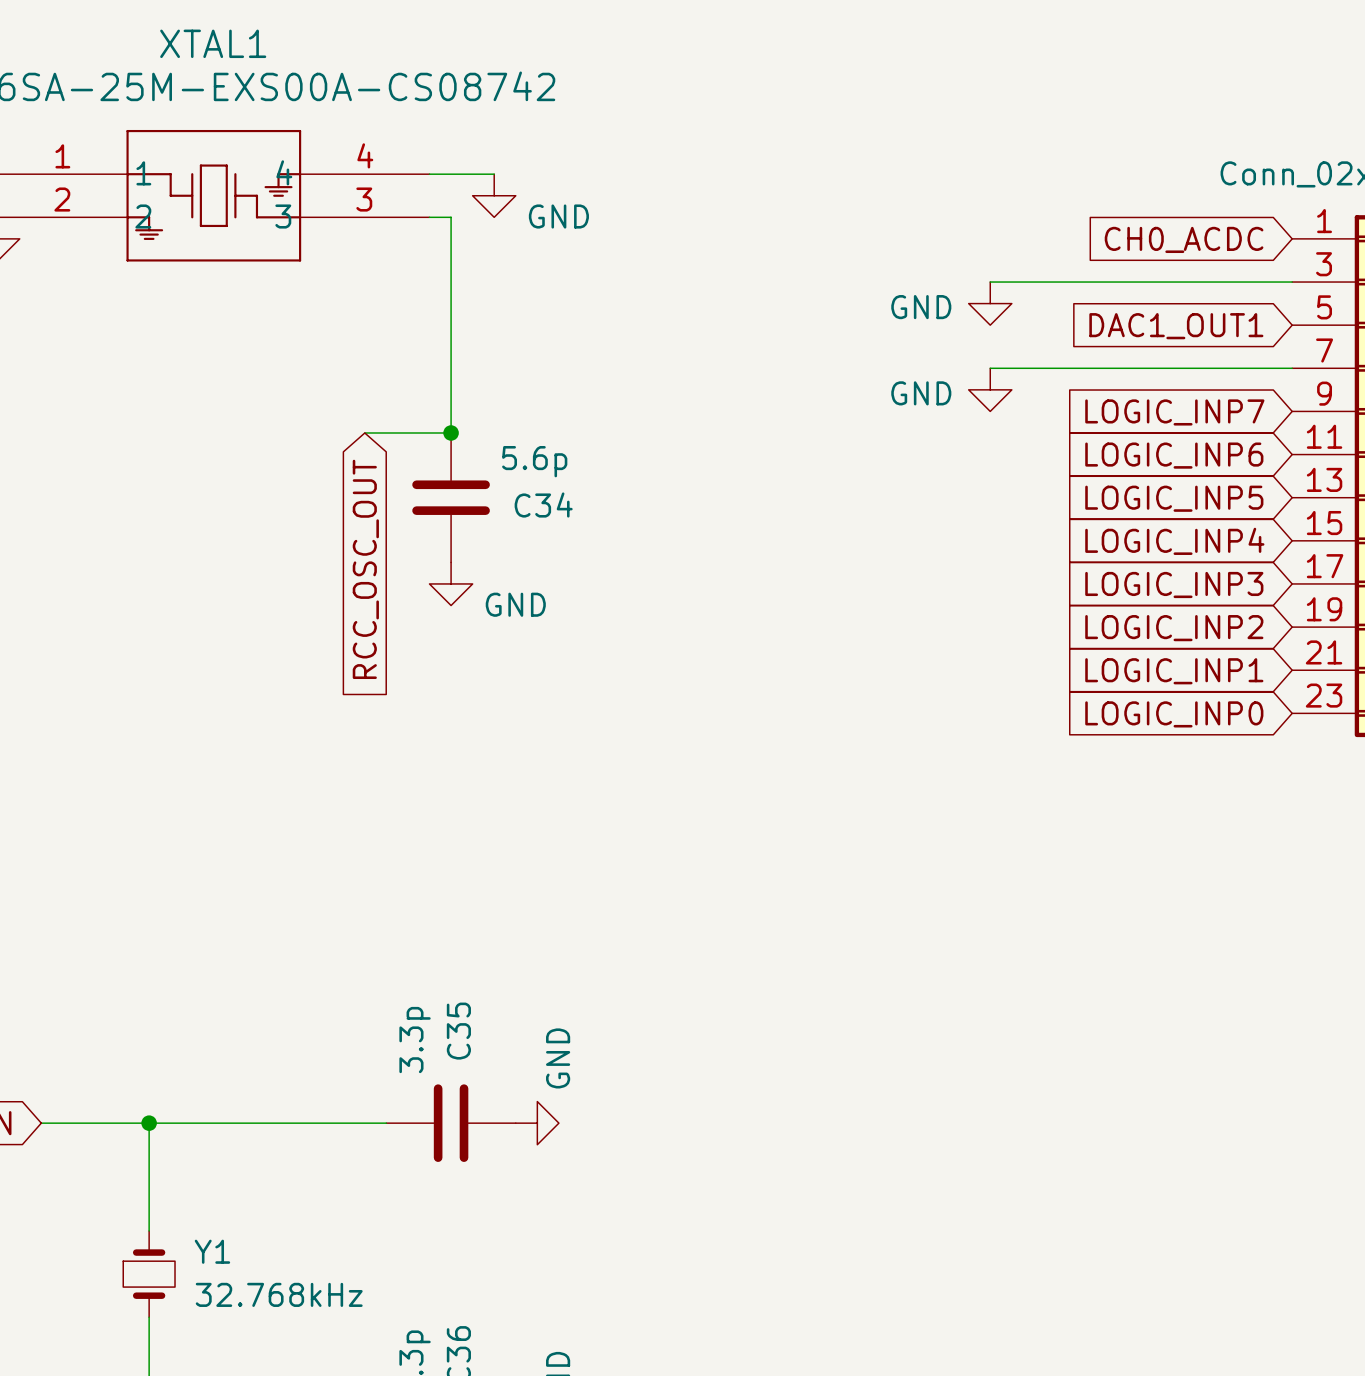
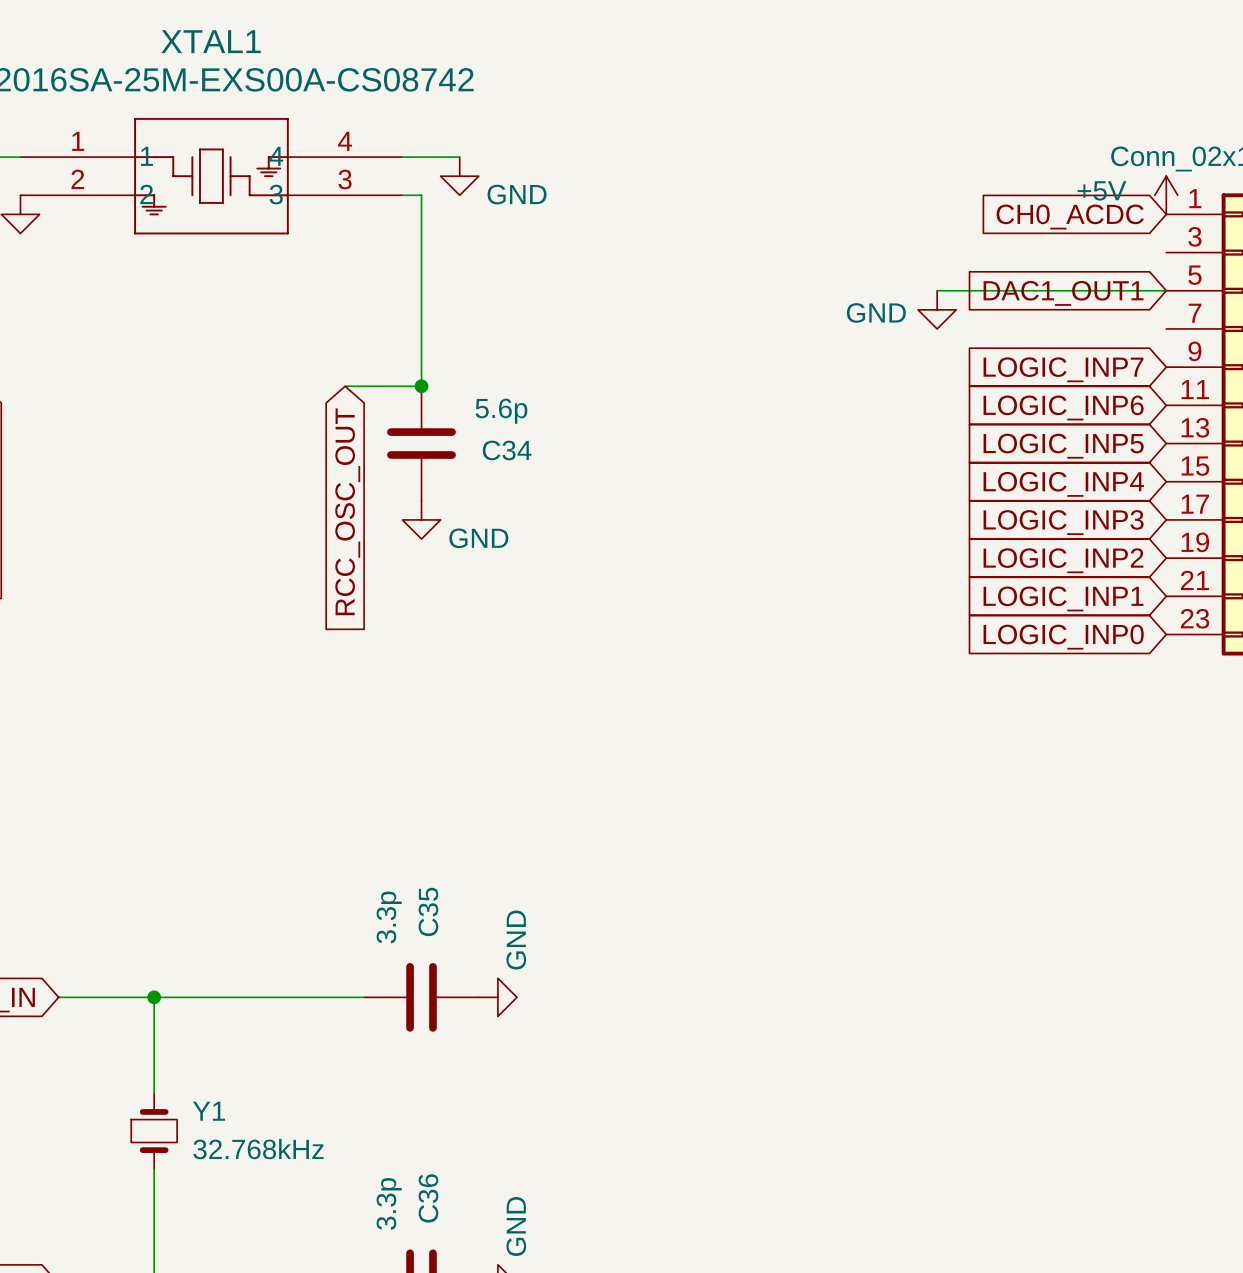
power symbol: none -> +5V (1166, 195)
wire: (990, 282) (1292, 282) -> none
power symbol: GND (990, 303) -> none
wire: none -> (937, 290) (1166, 290)
power symbol: none -> GND (937, 309)
wire: (990, 368) (1292, 368) -> none
power symbol: GND (990, 389) -> none

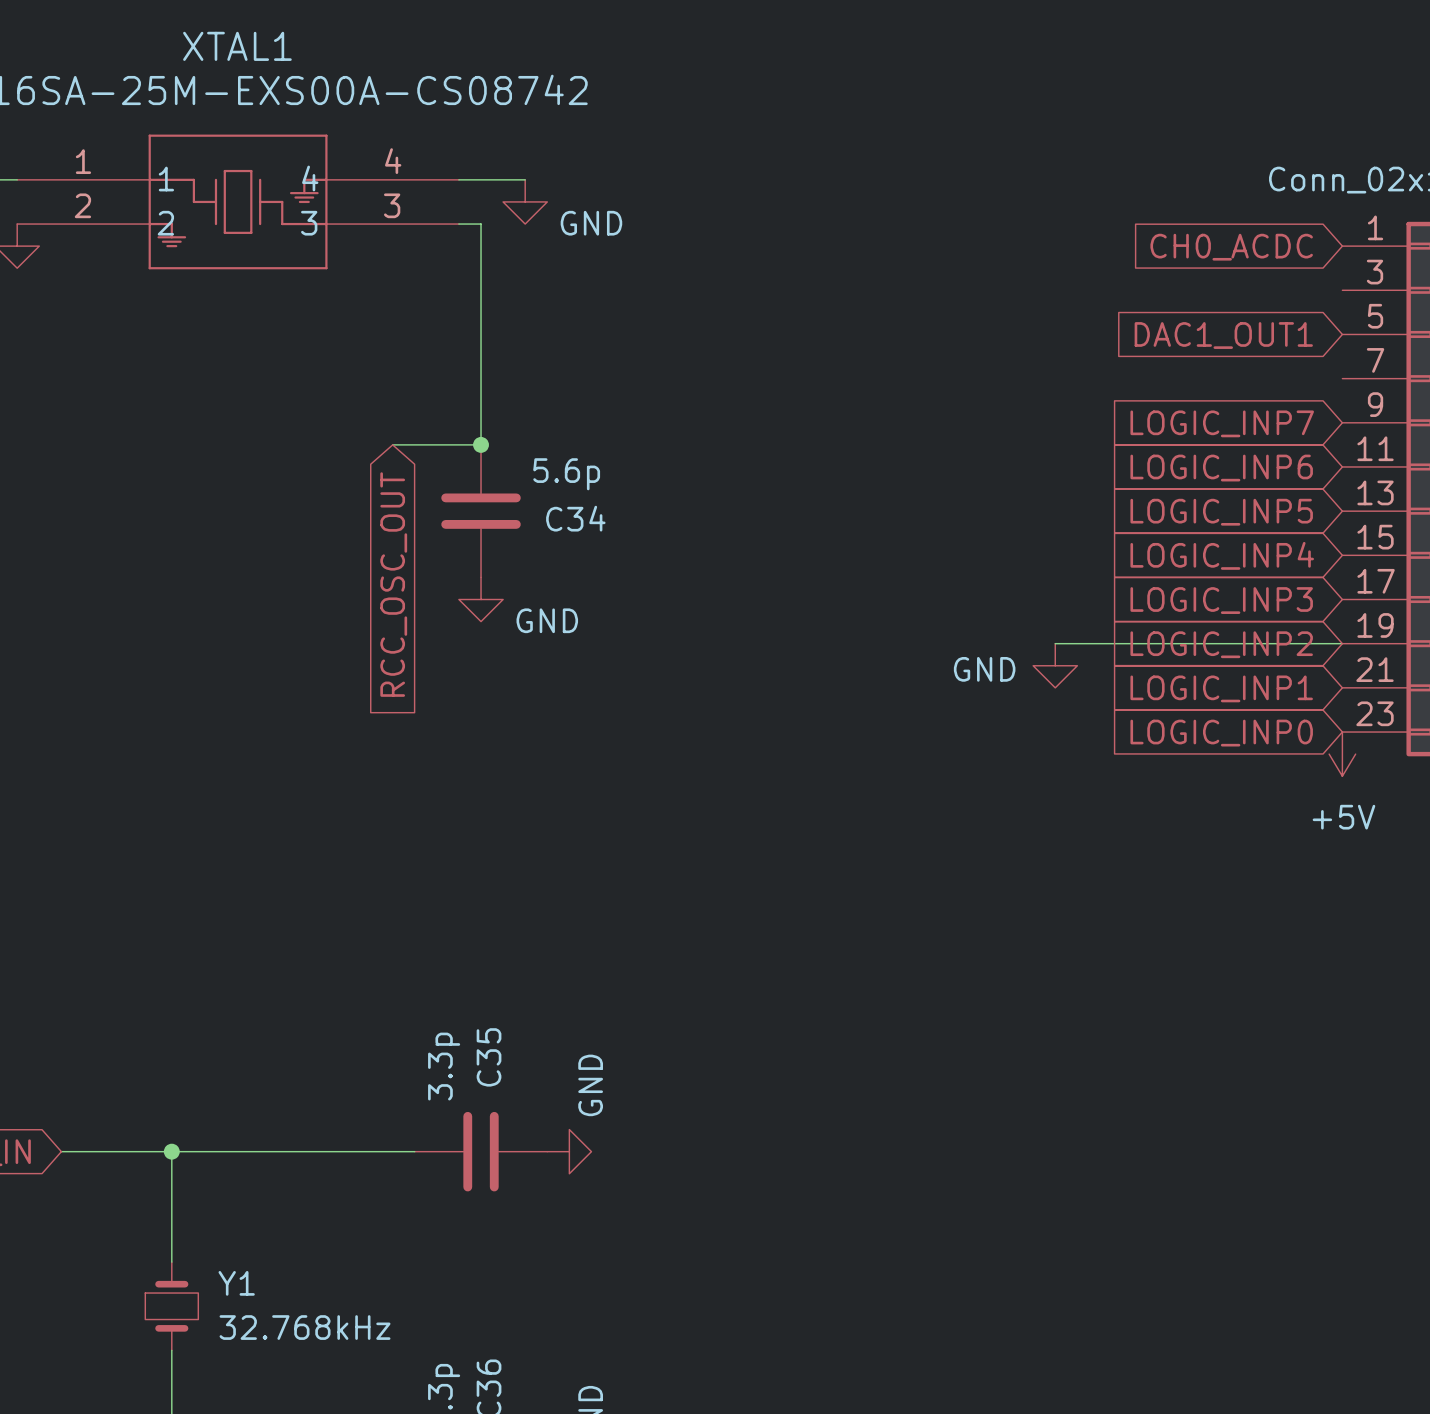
power symbol: +5V (1166, 195) -> none
wire: (937, 290) (1166, 290) -> none
power symbol position: GND (937, 309) -> GND (1055, 665)
wire: none -> (1055, 643) (1342, 643)
power symbol: none -> +5V (1342, 754)

